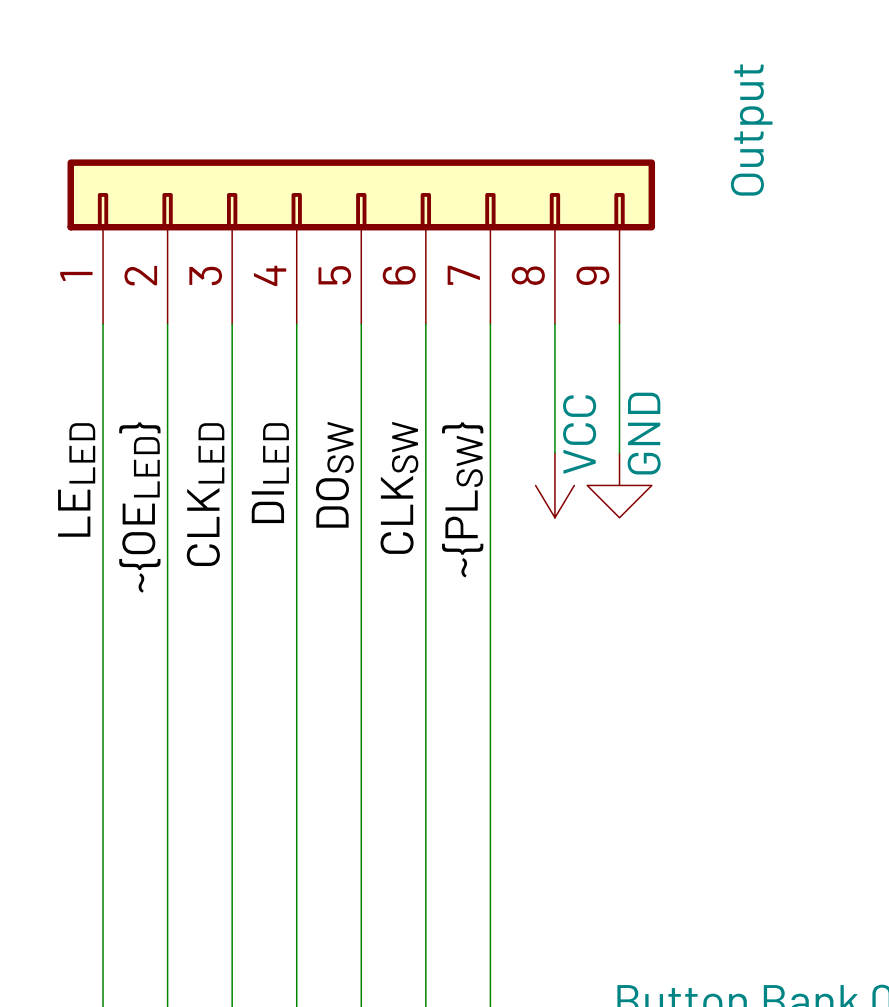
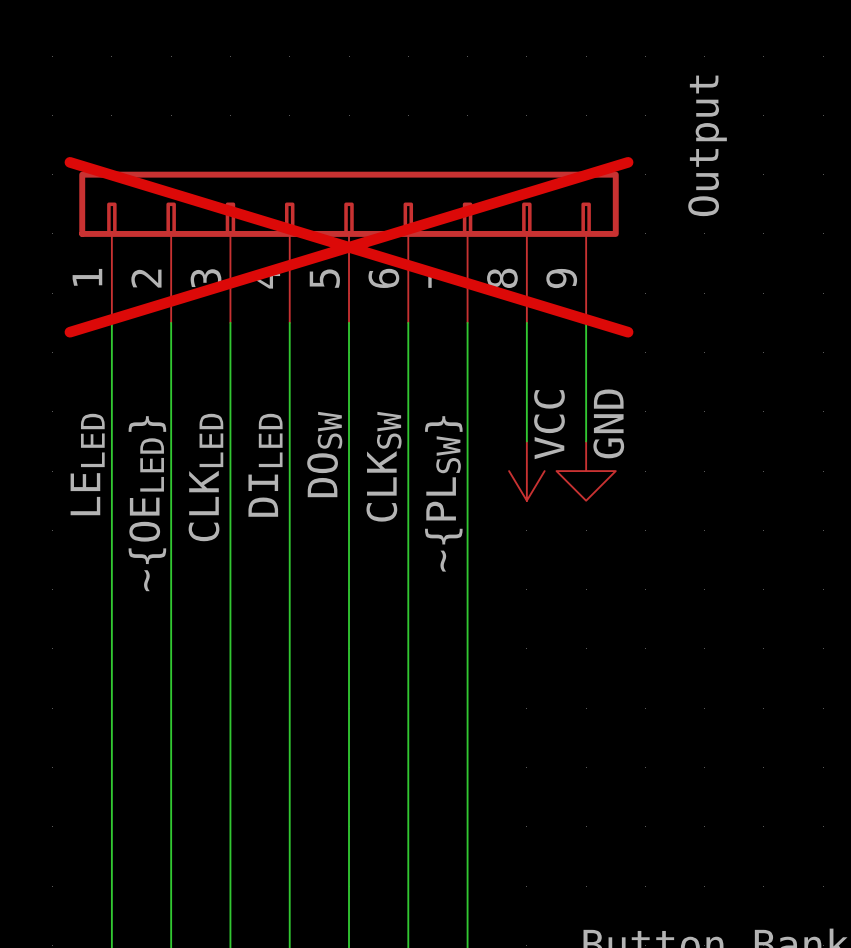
part do-not-place cross: none -> (349, 247)

